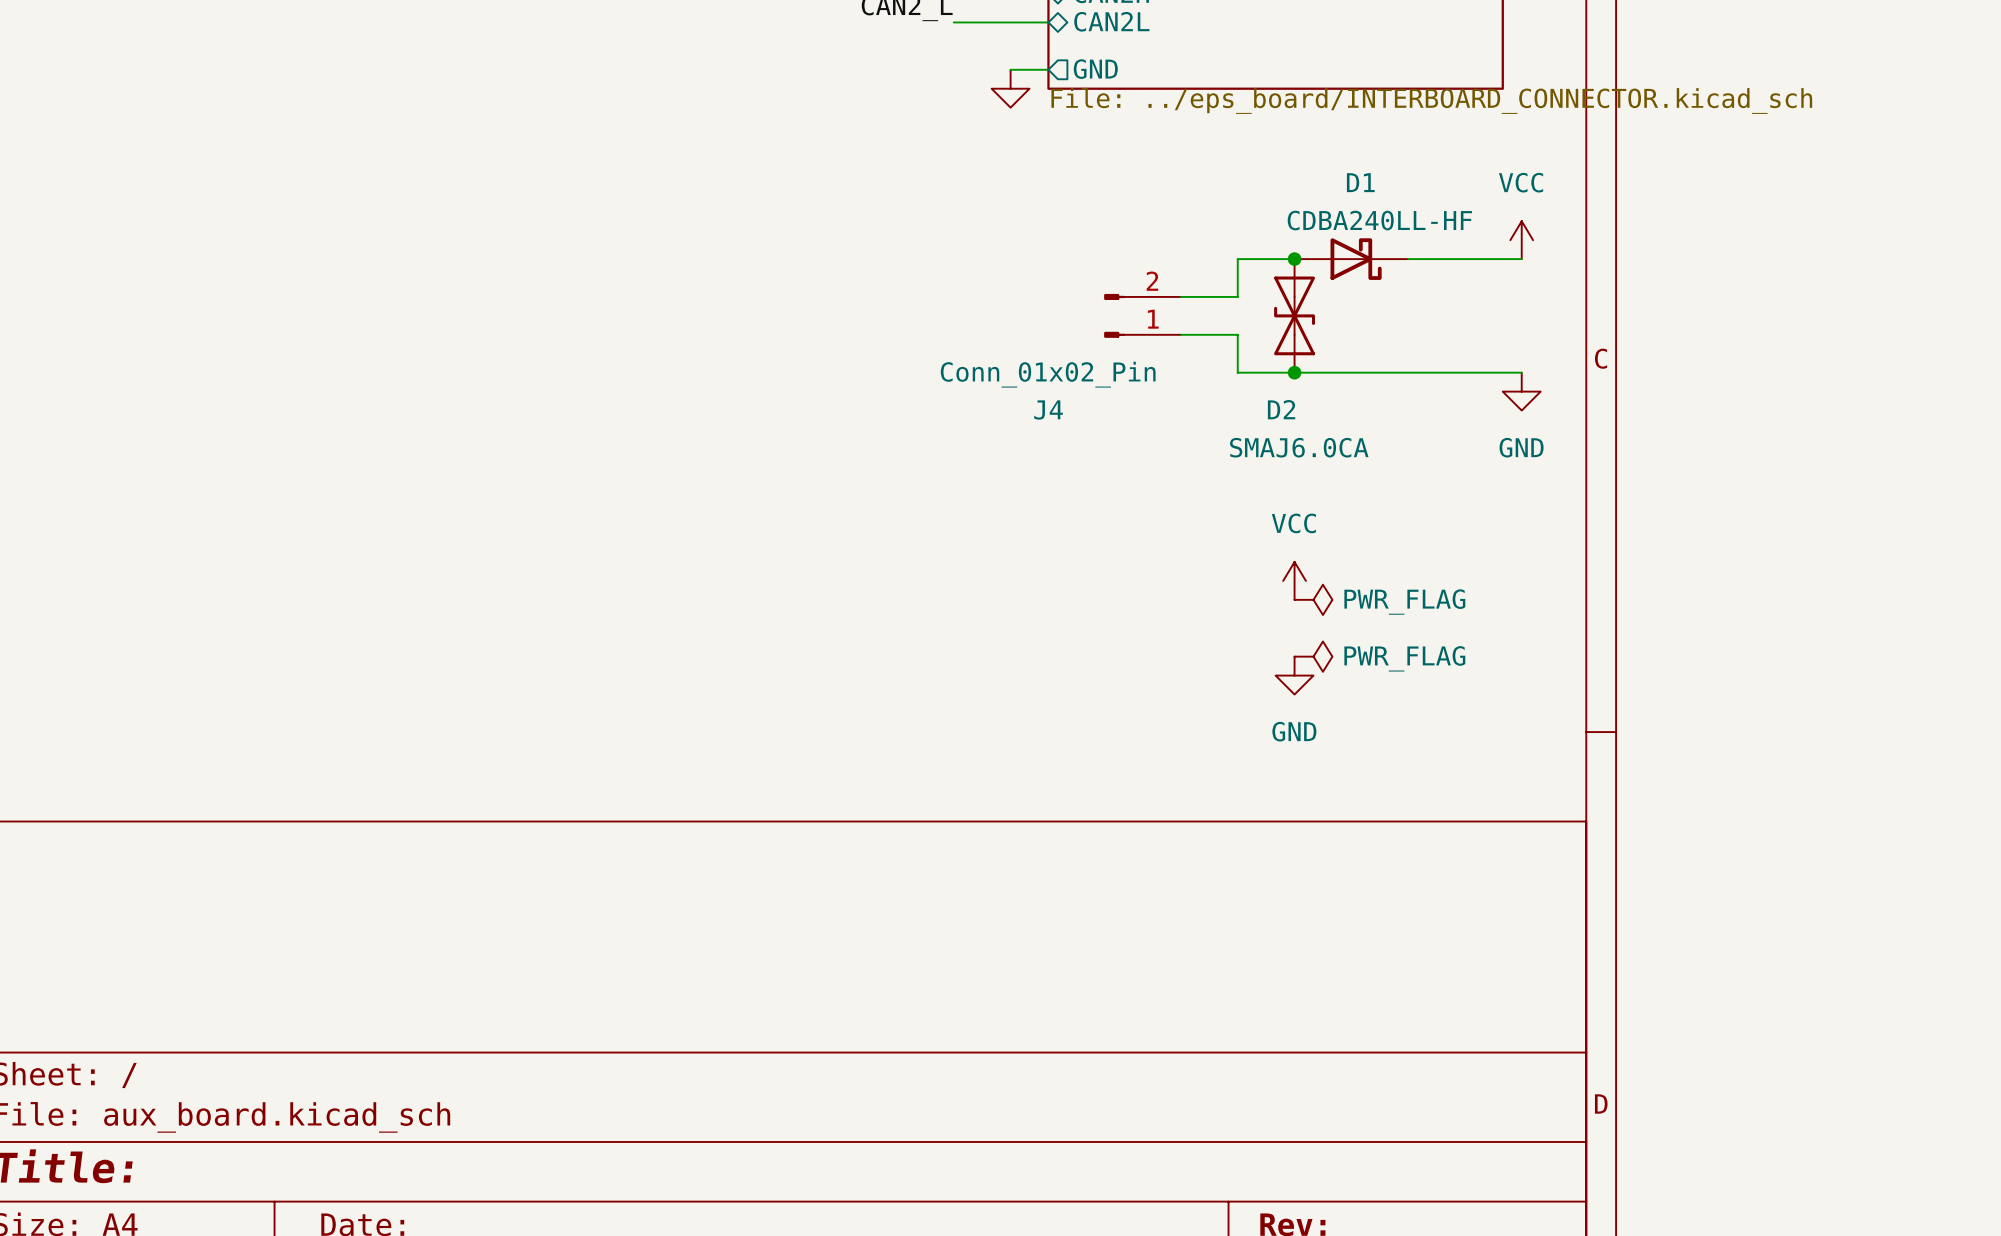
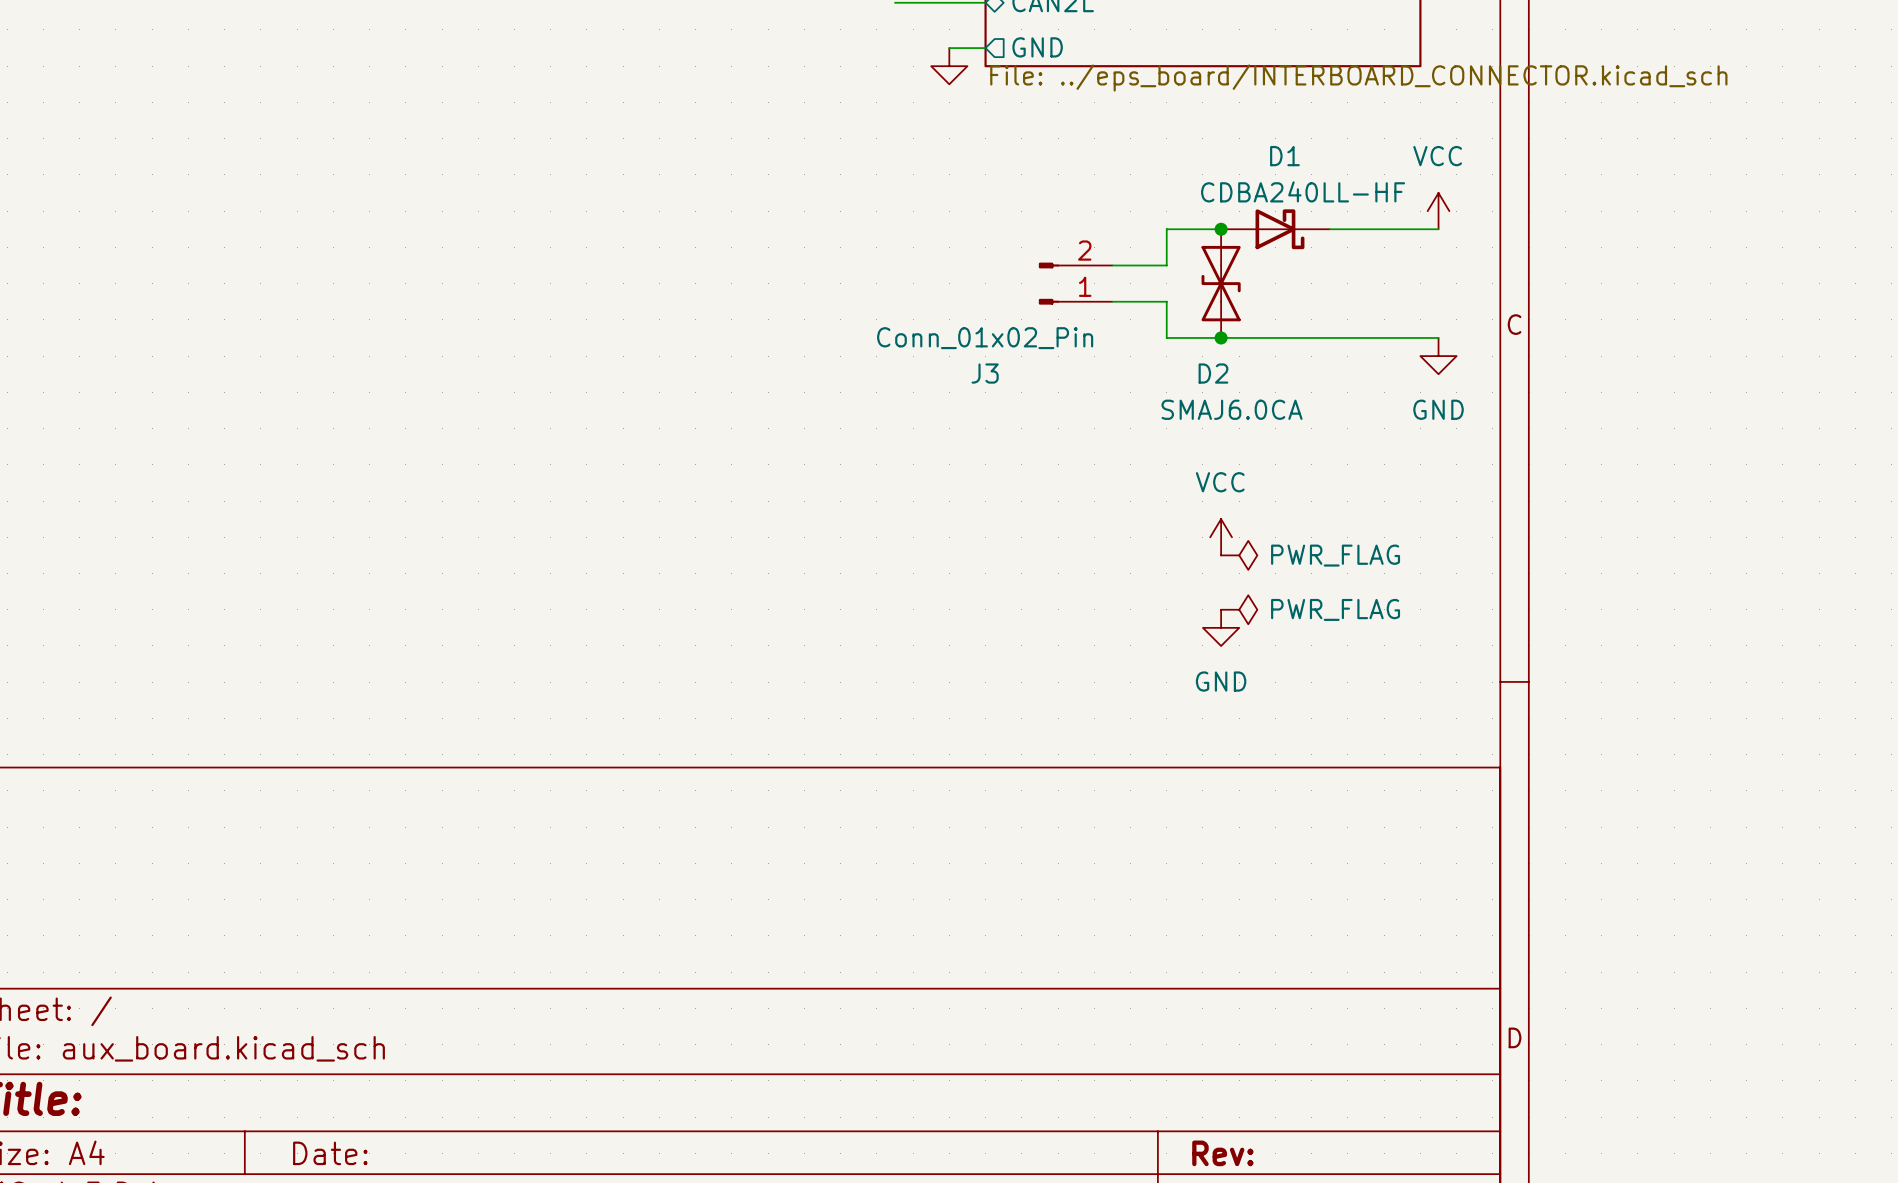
J4 name: J4 (1048, 410) -> J3 (985, 373)

